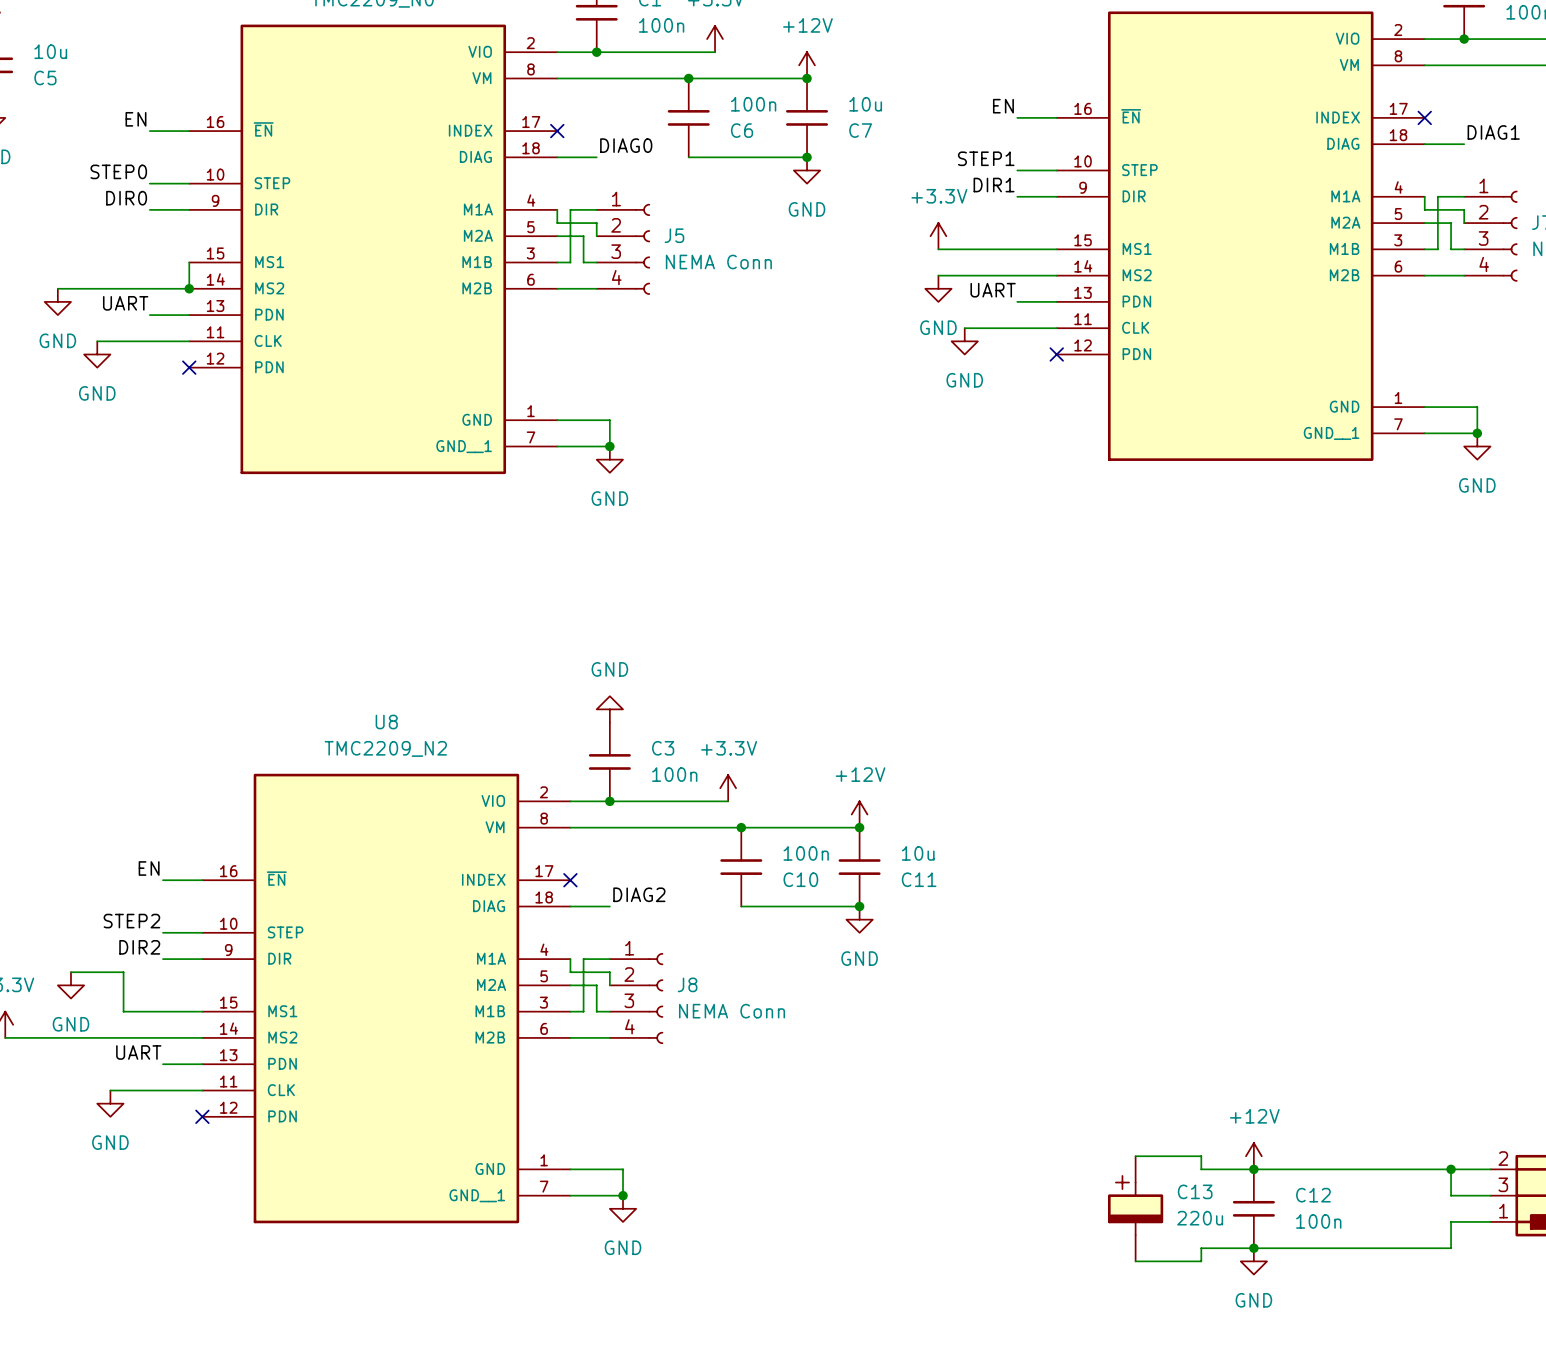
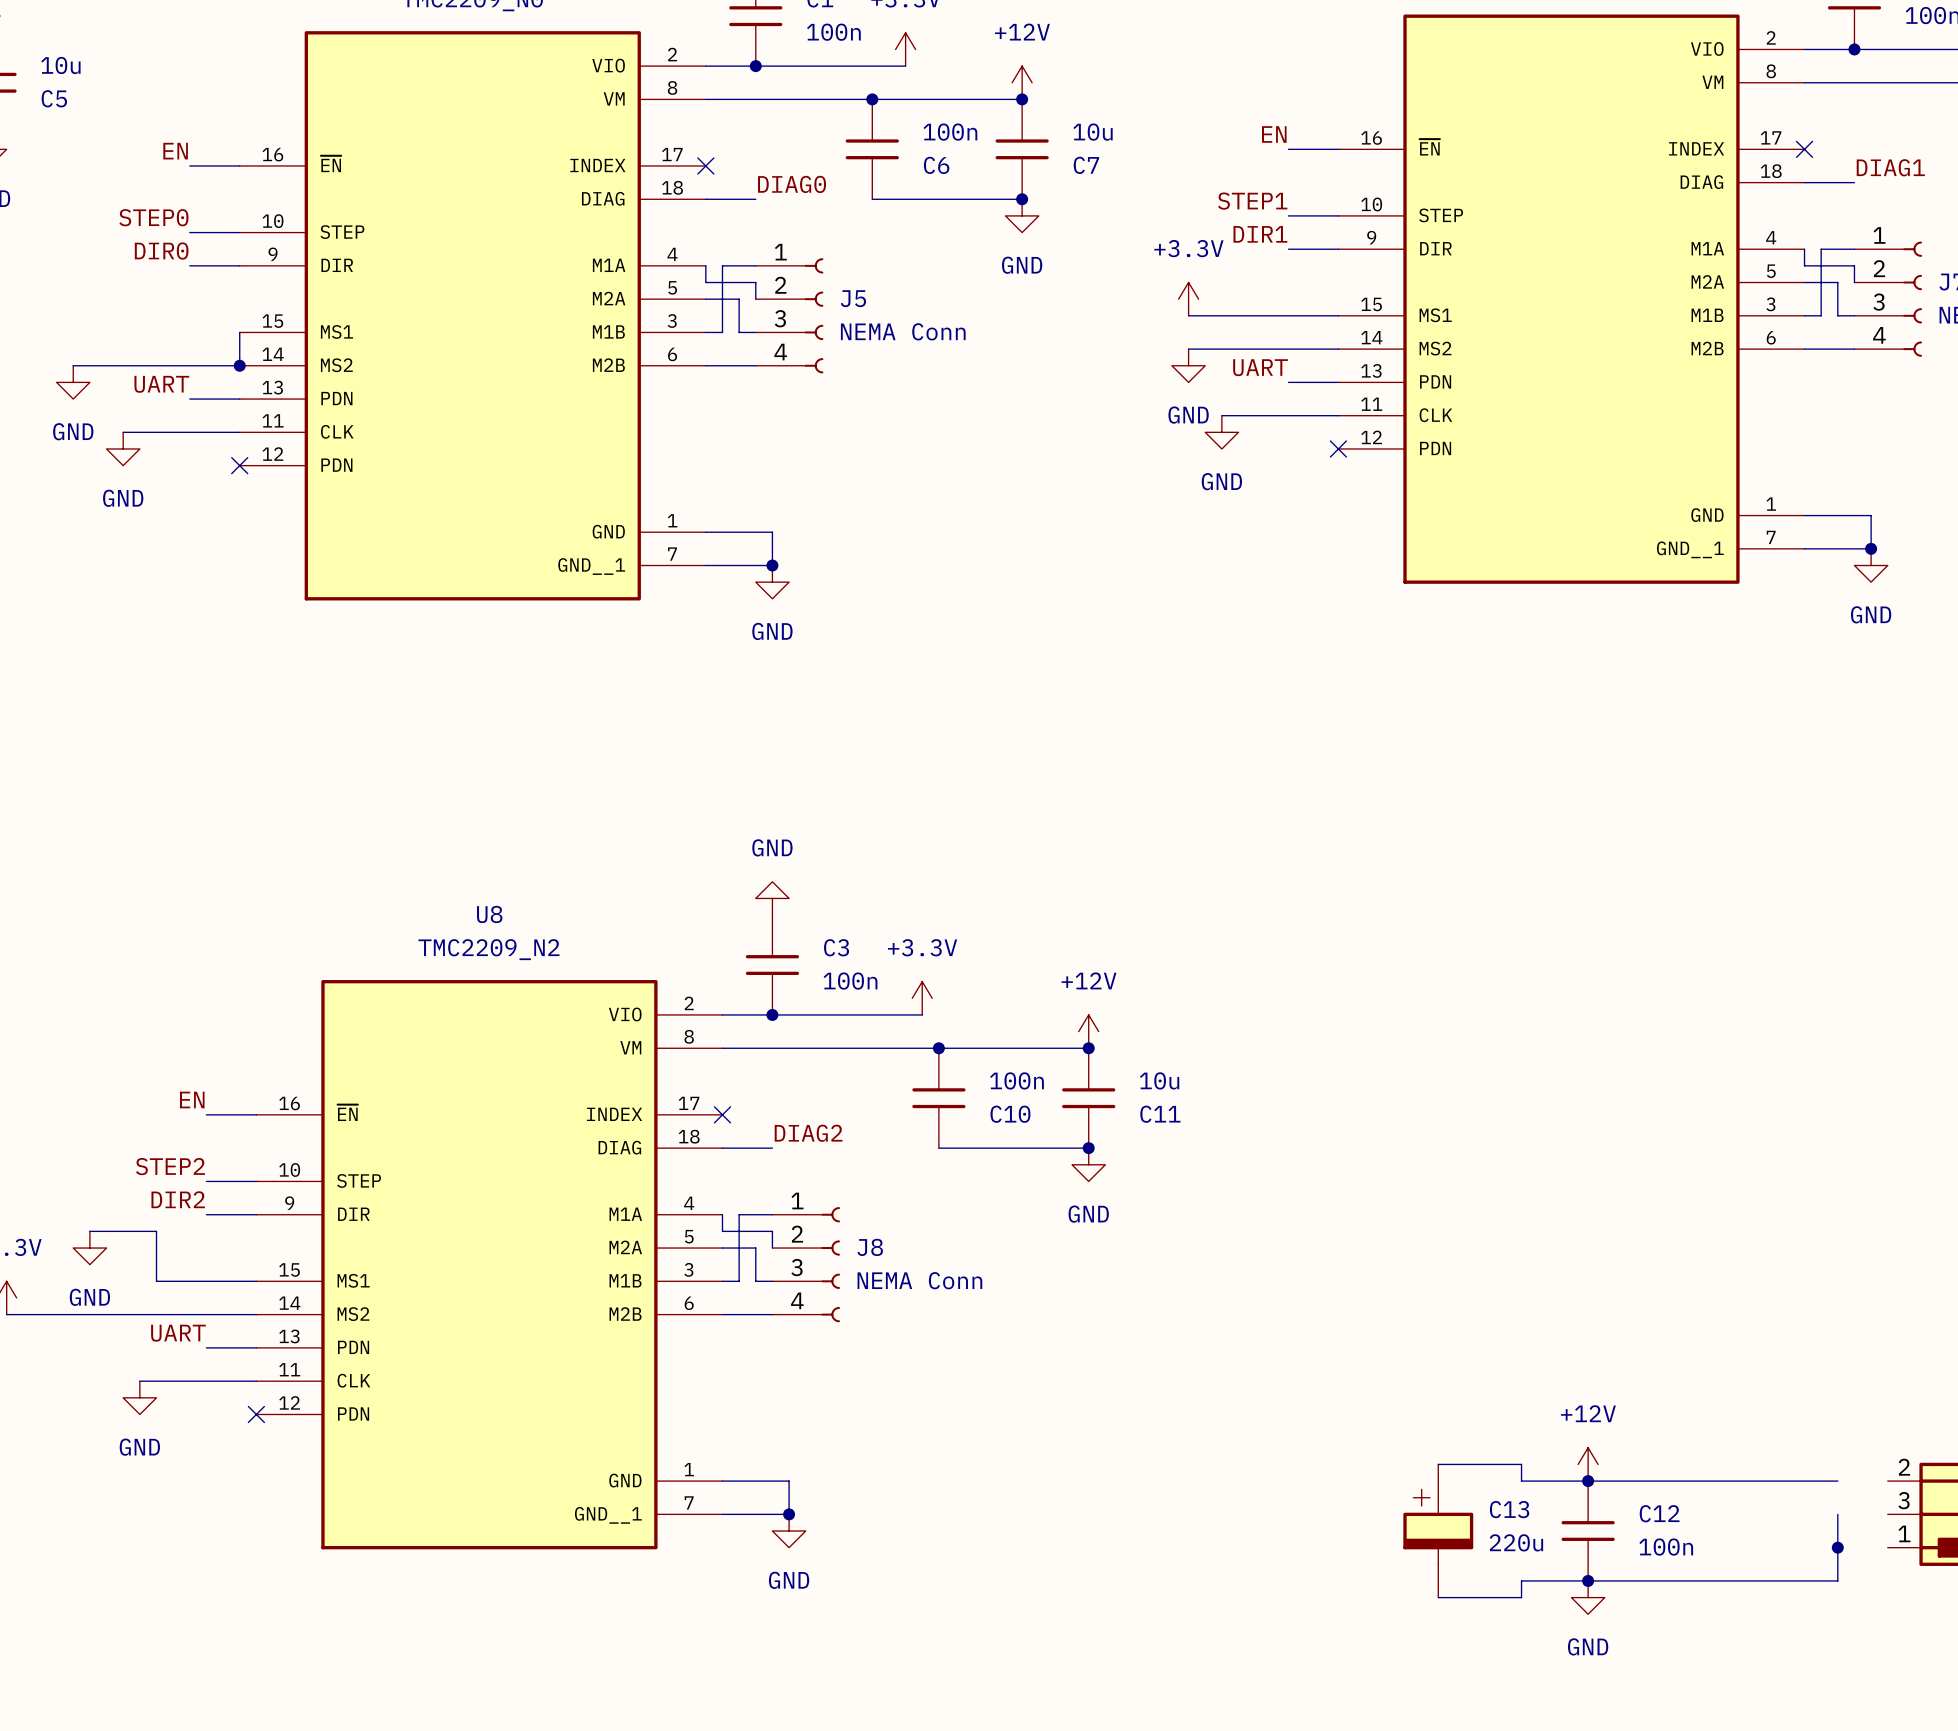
junction position: (1451, 1169) -> (1837, 1547)
wire: (1490, 1169) (1451, 1169) (1451, 1195) (1490, 1195) -> none
wire: (1451, 1221) (1490, 1221) -> (1837, 1547) (1837, 1514)

